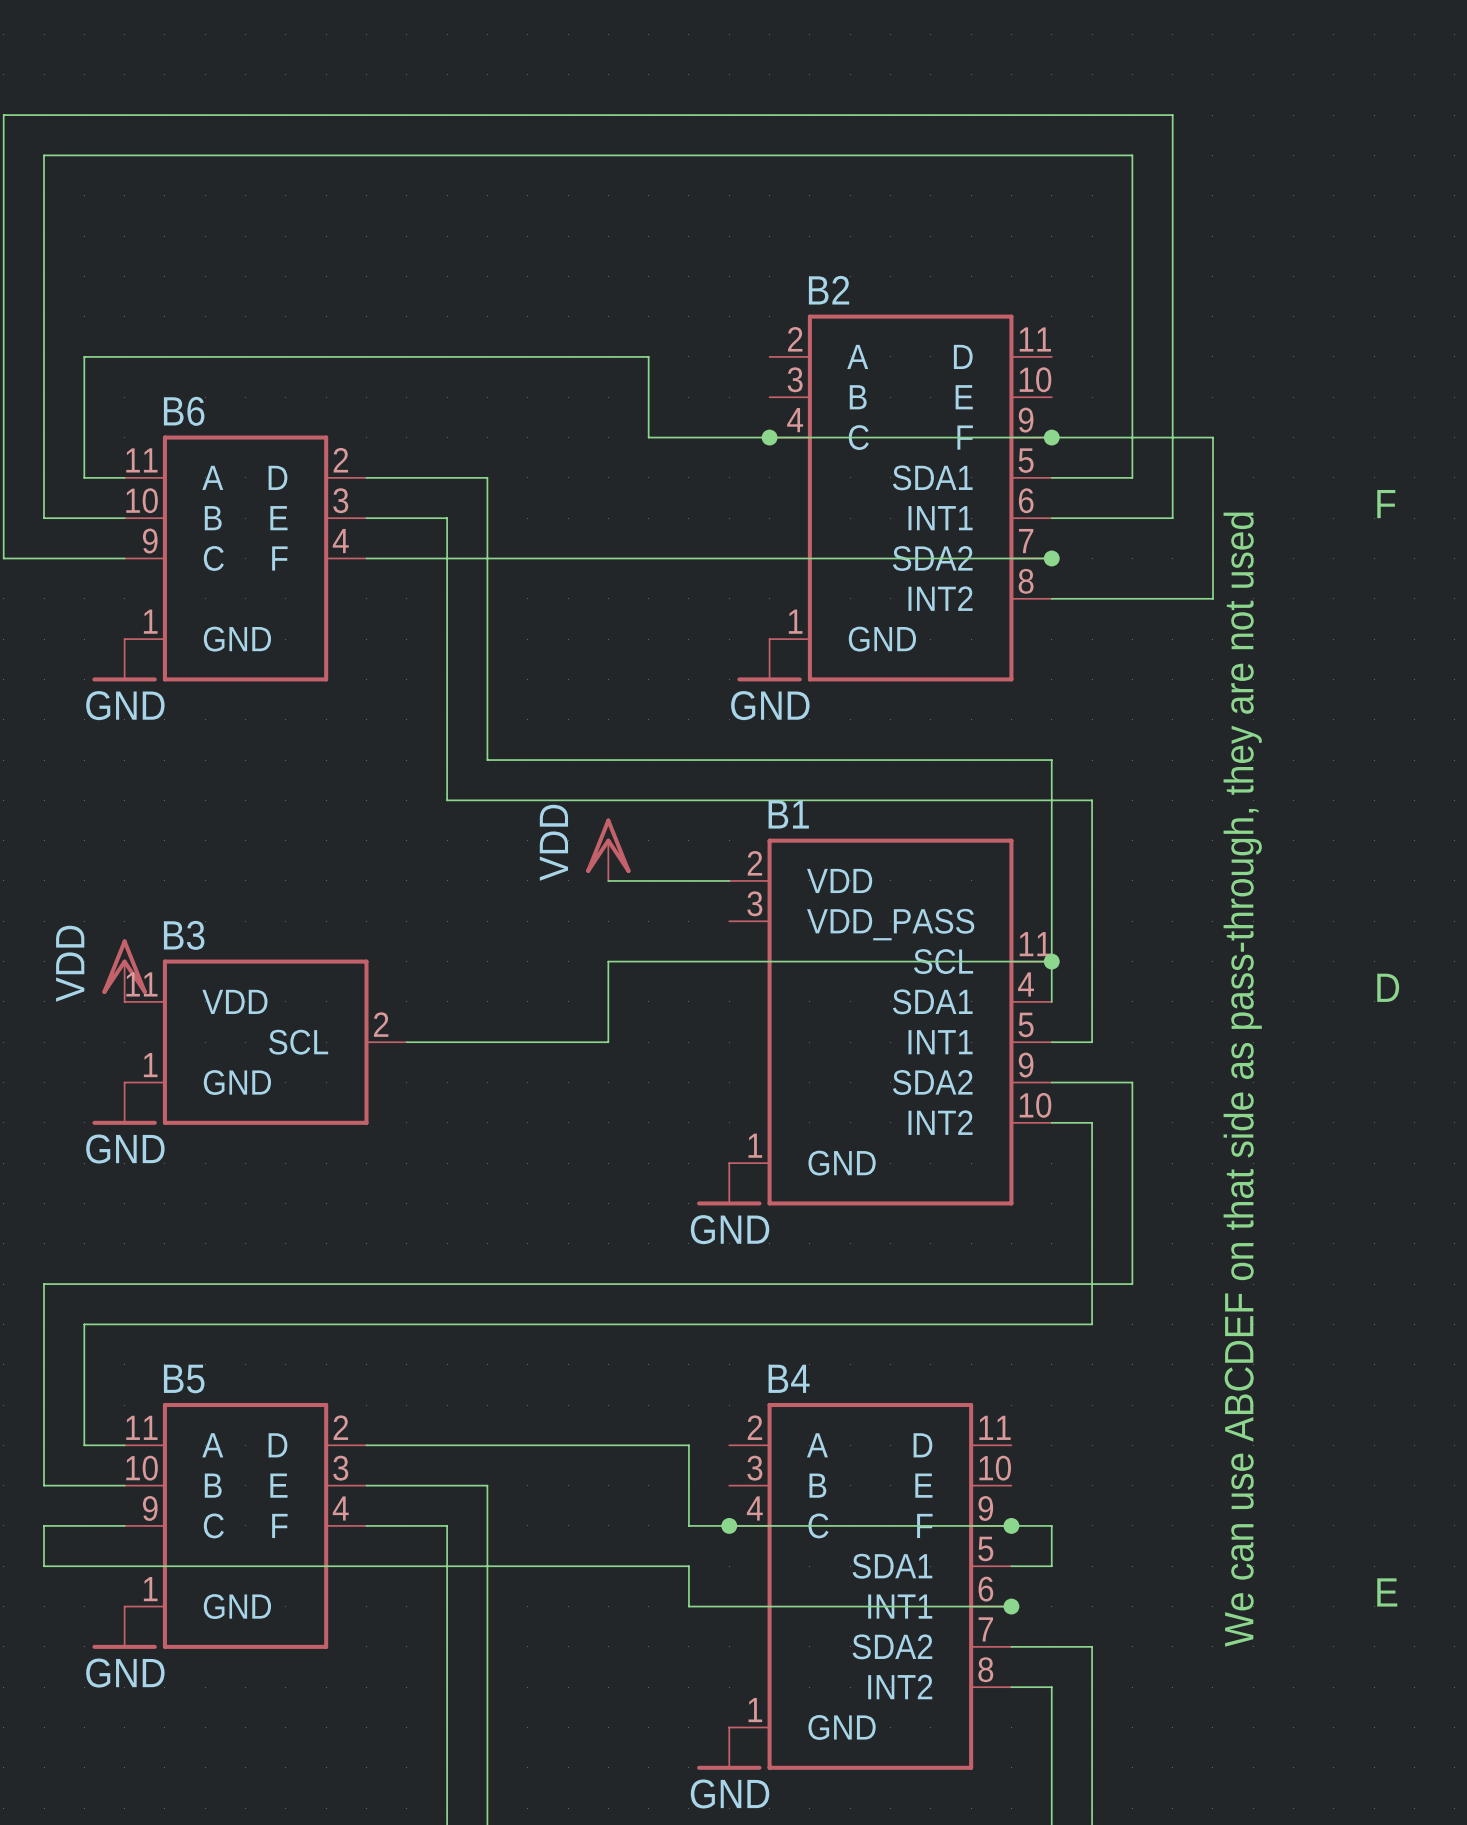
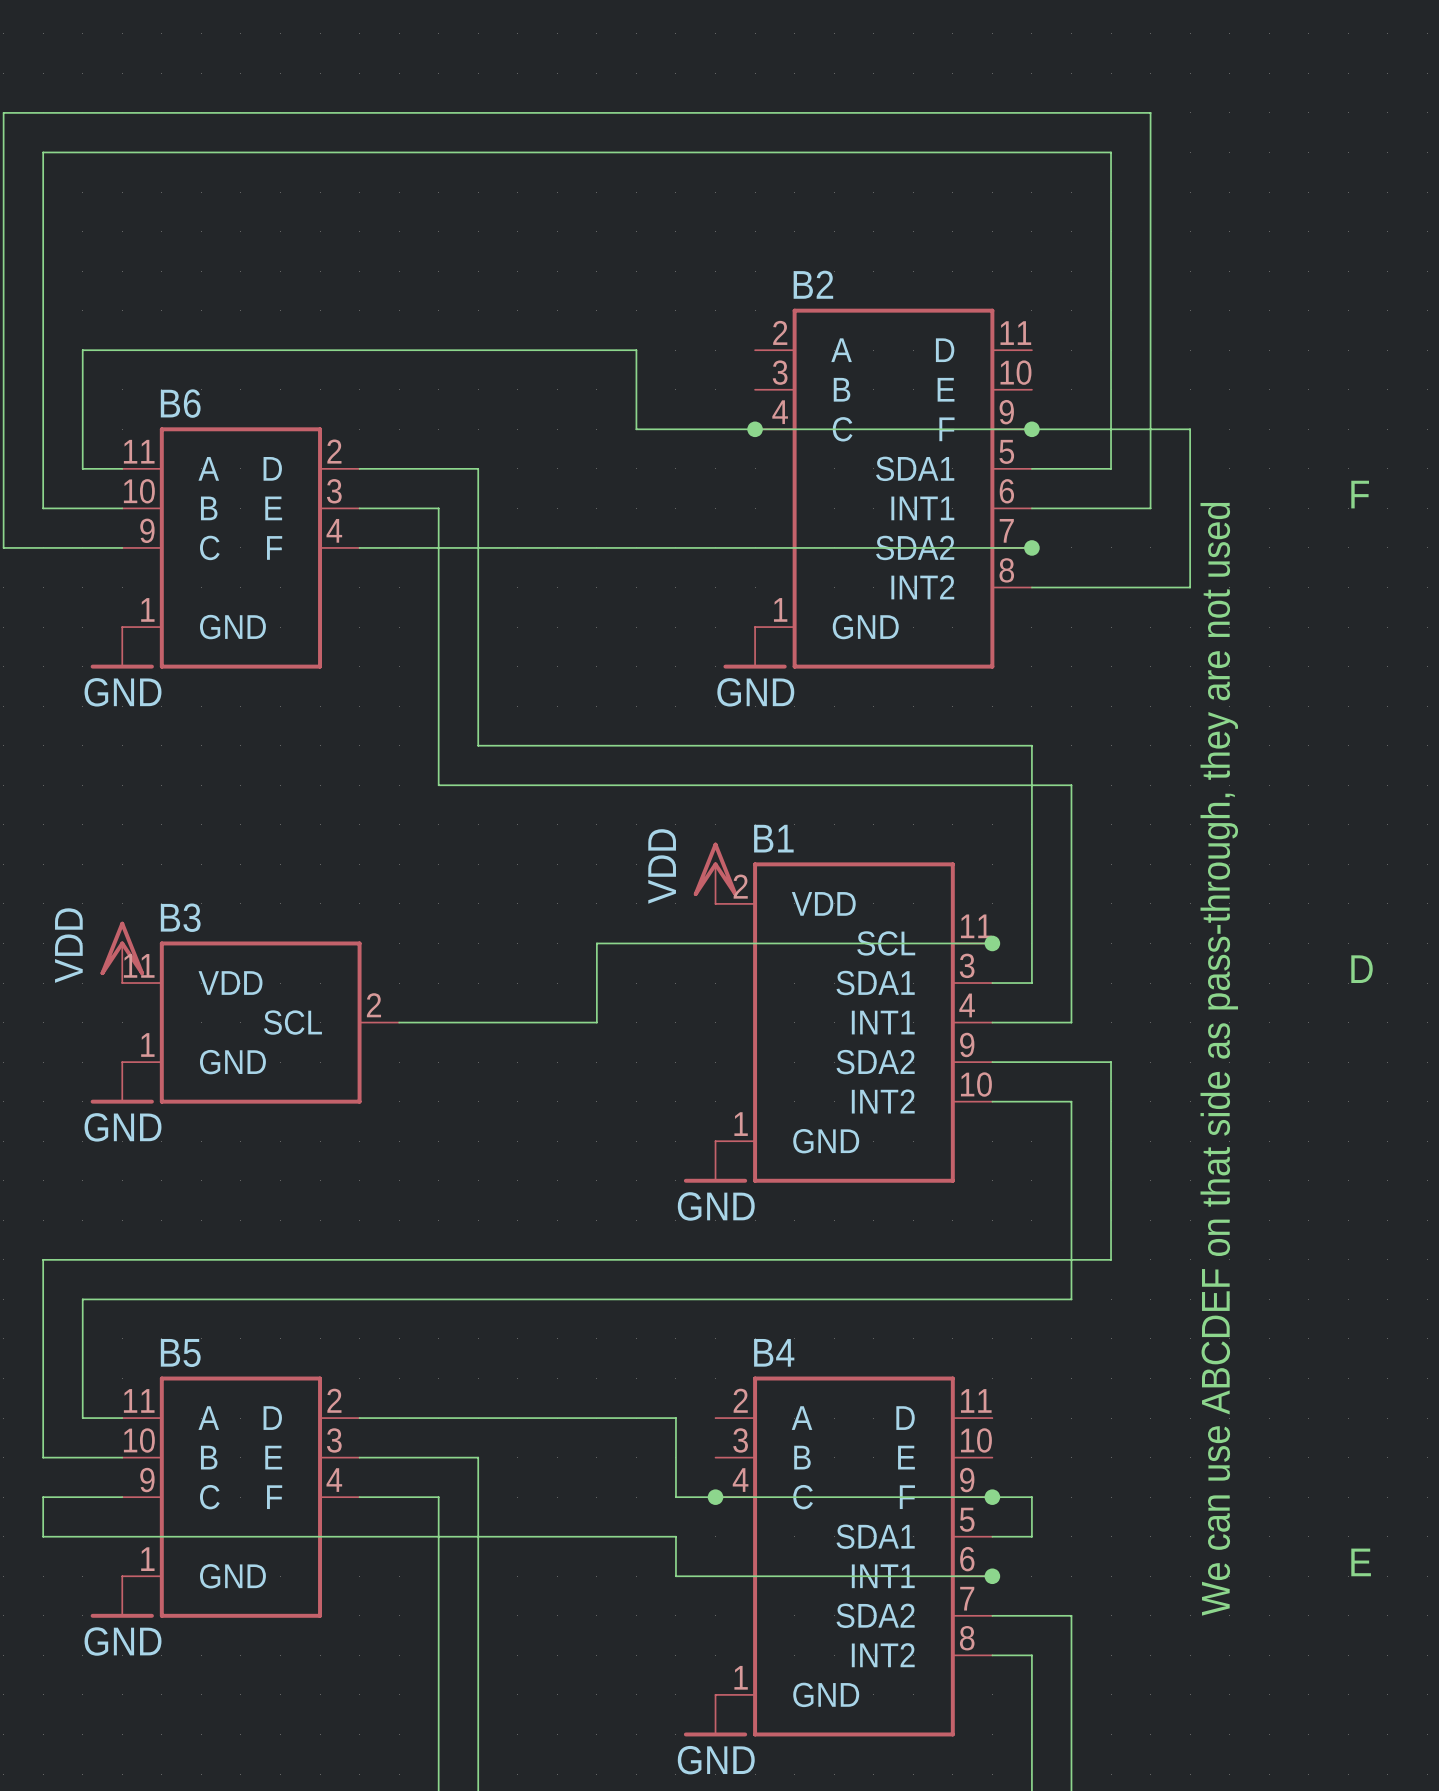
B1 symbol: [729, 838, 1052, 1206] -> [715, 862, 993, 1183]
power symbol position: VDD (608, 849) -> VDD (715, 873)
wire: (608, 880) (729, 880) -> none
junction position: (1051, 961) -> (992, 943)

